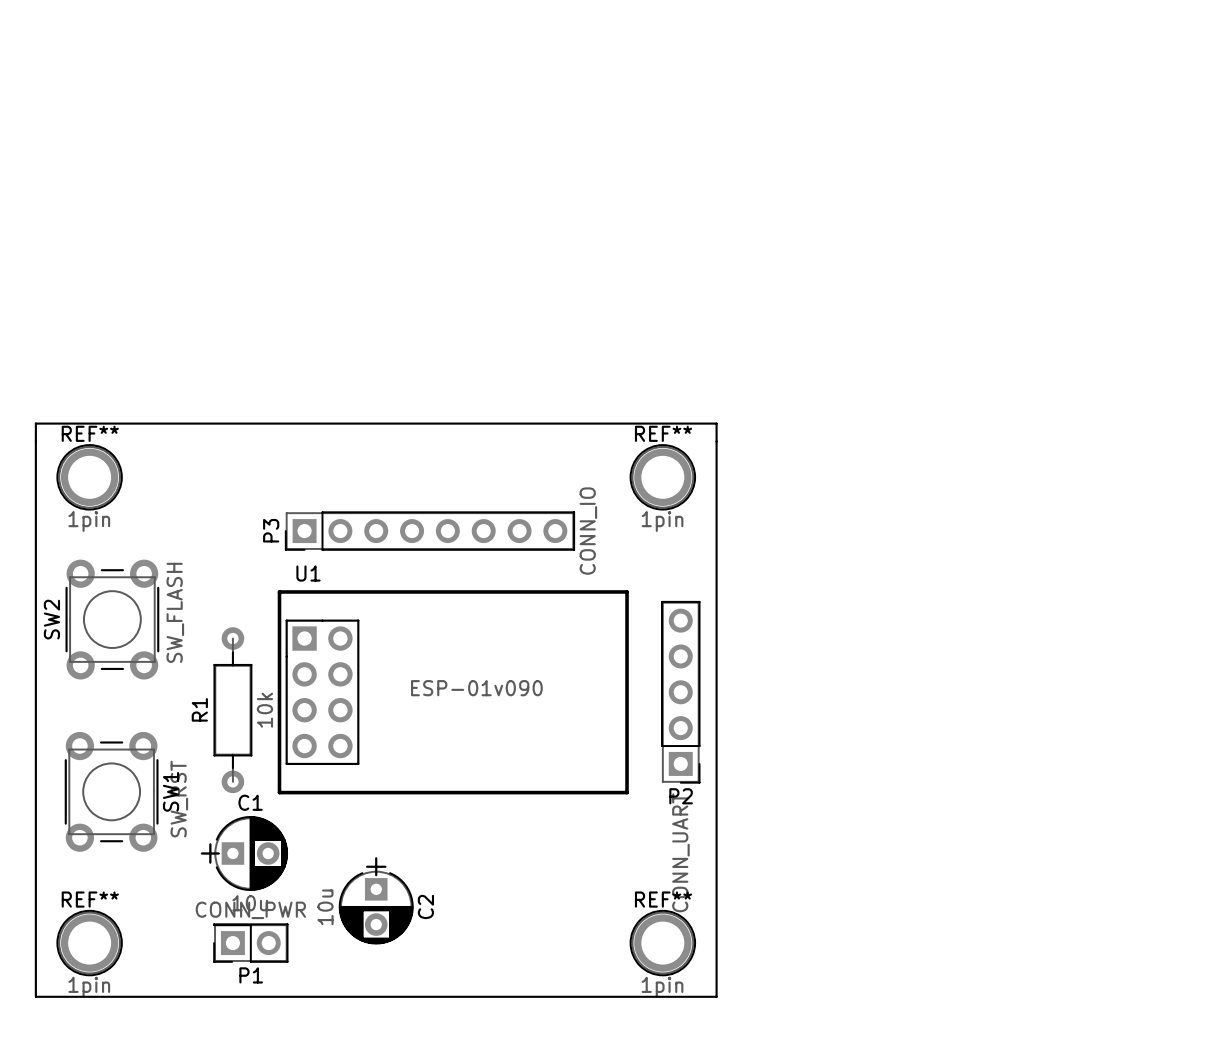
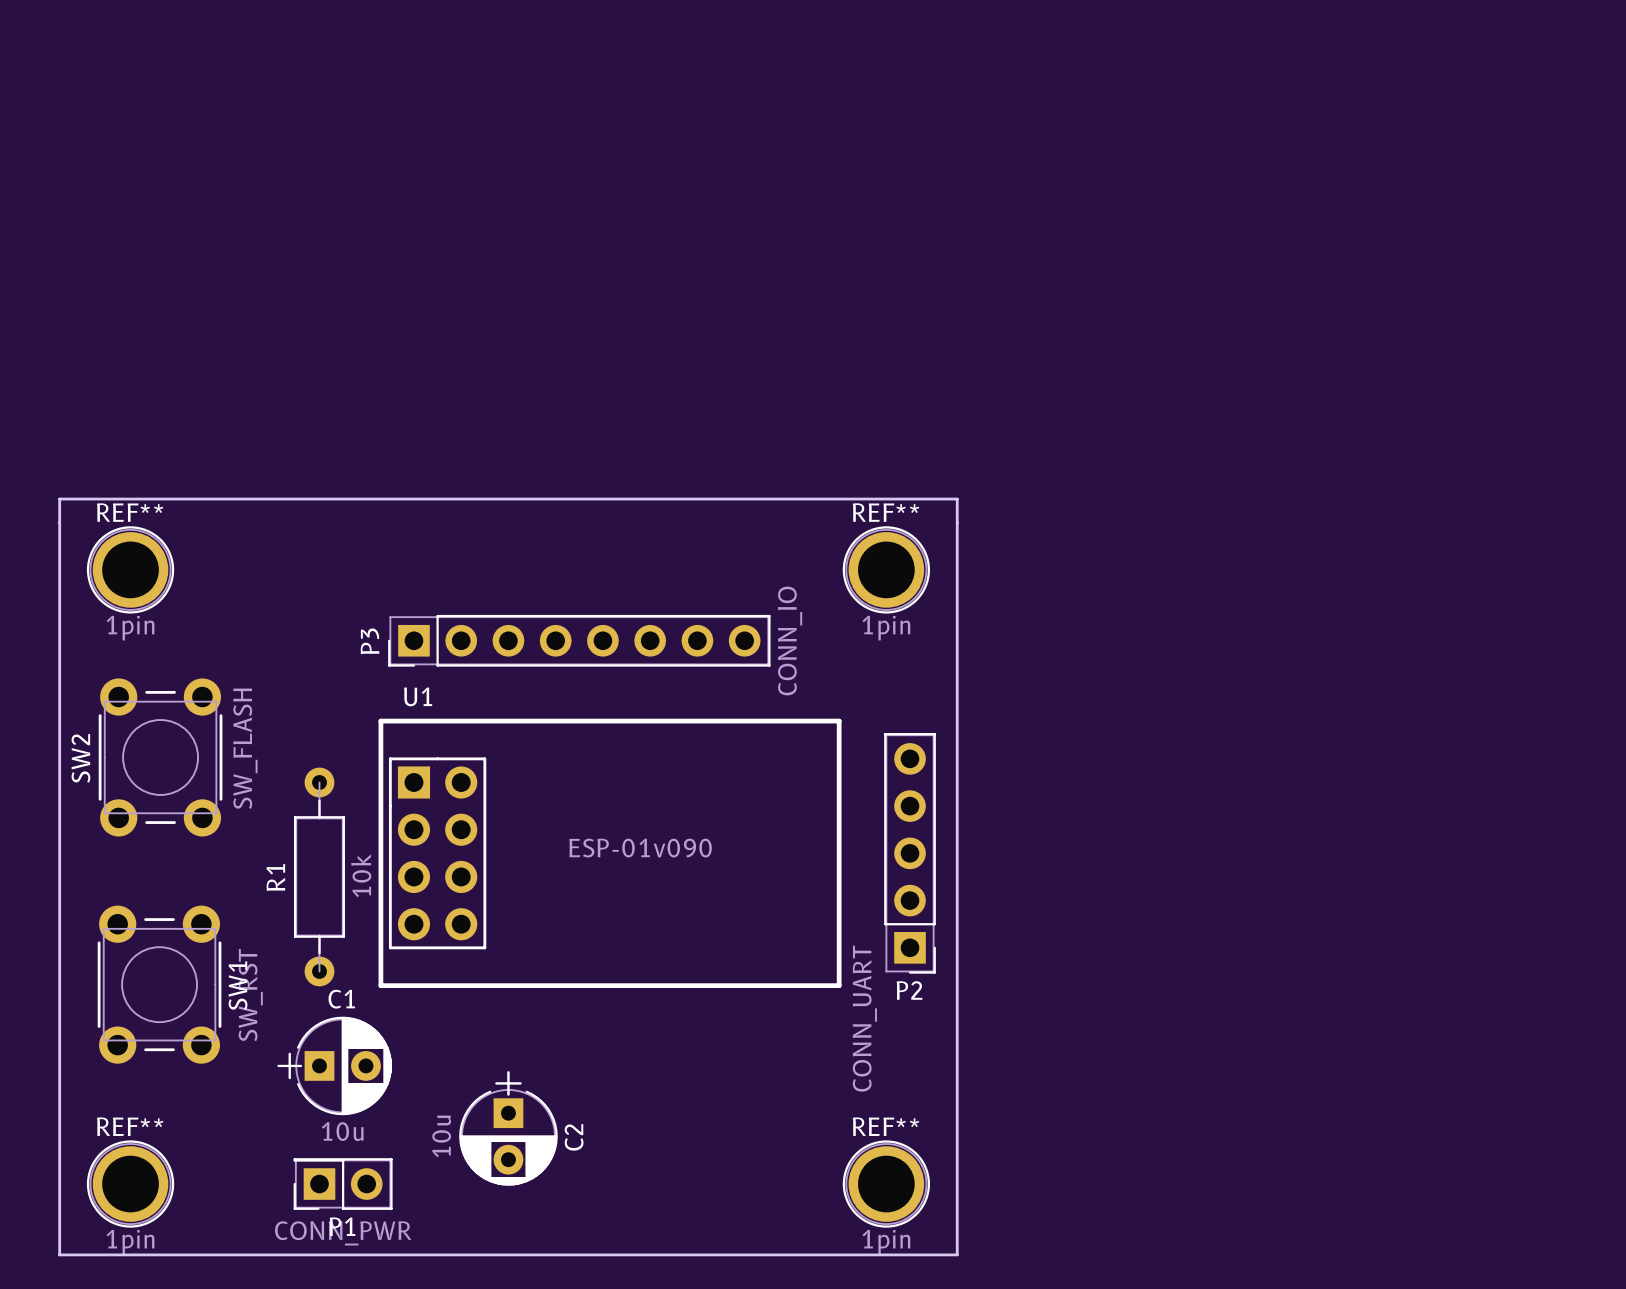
P2 value position: CONN_UART (680, 852) -> CONN_UART (864, 1018)
P1 value position: CONN_PWR (250, 910) -> CONN_PWR (343, 1233)

